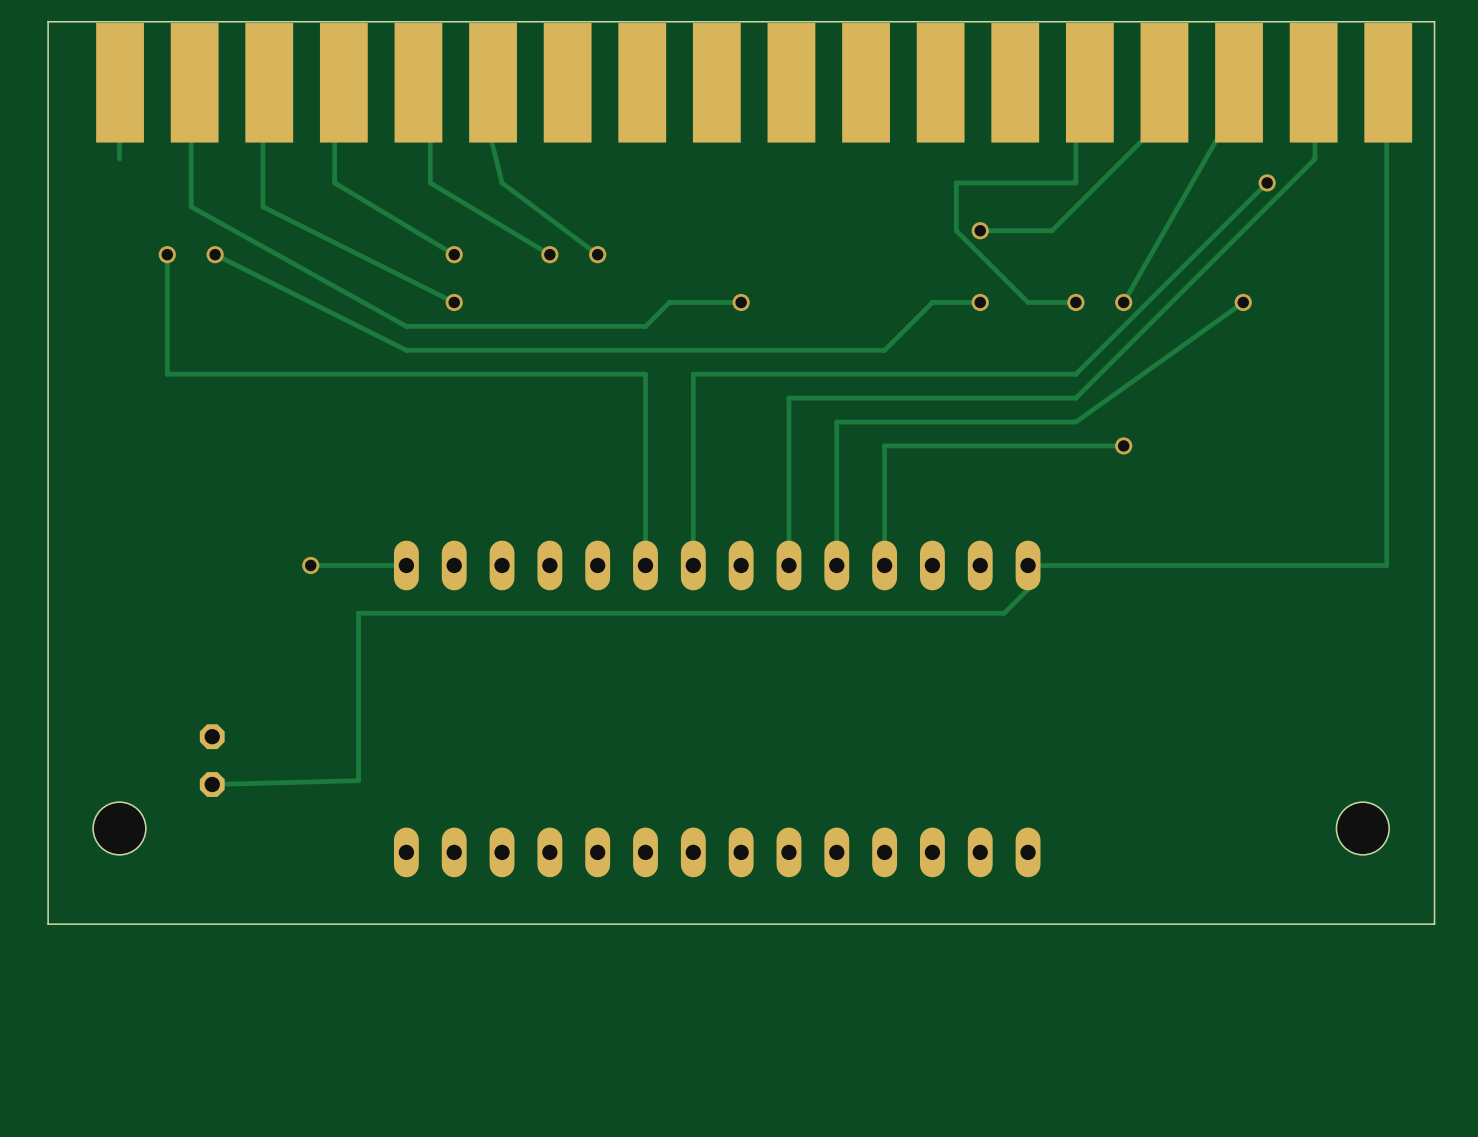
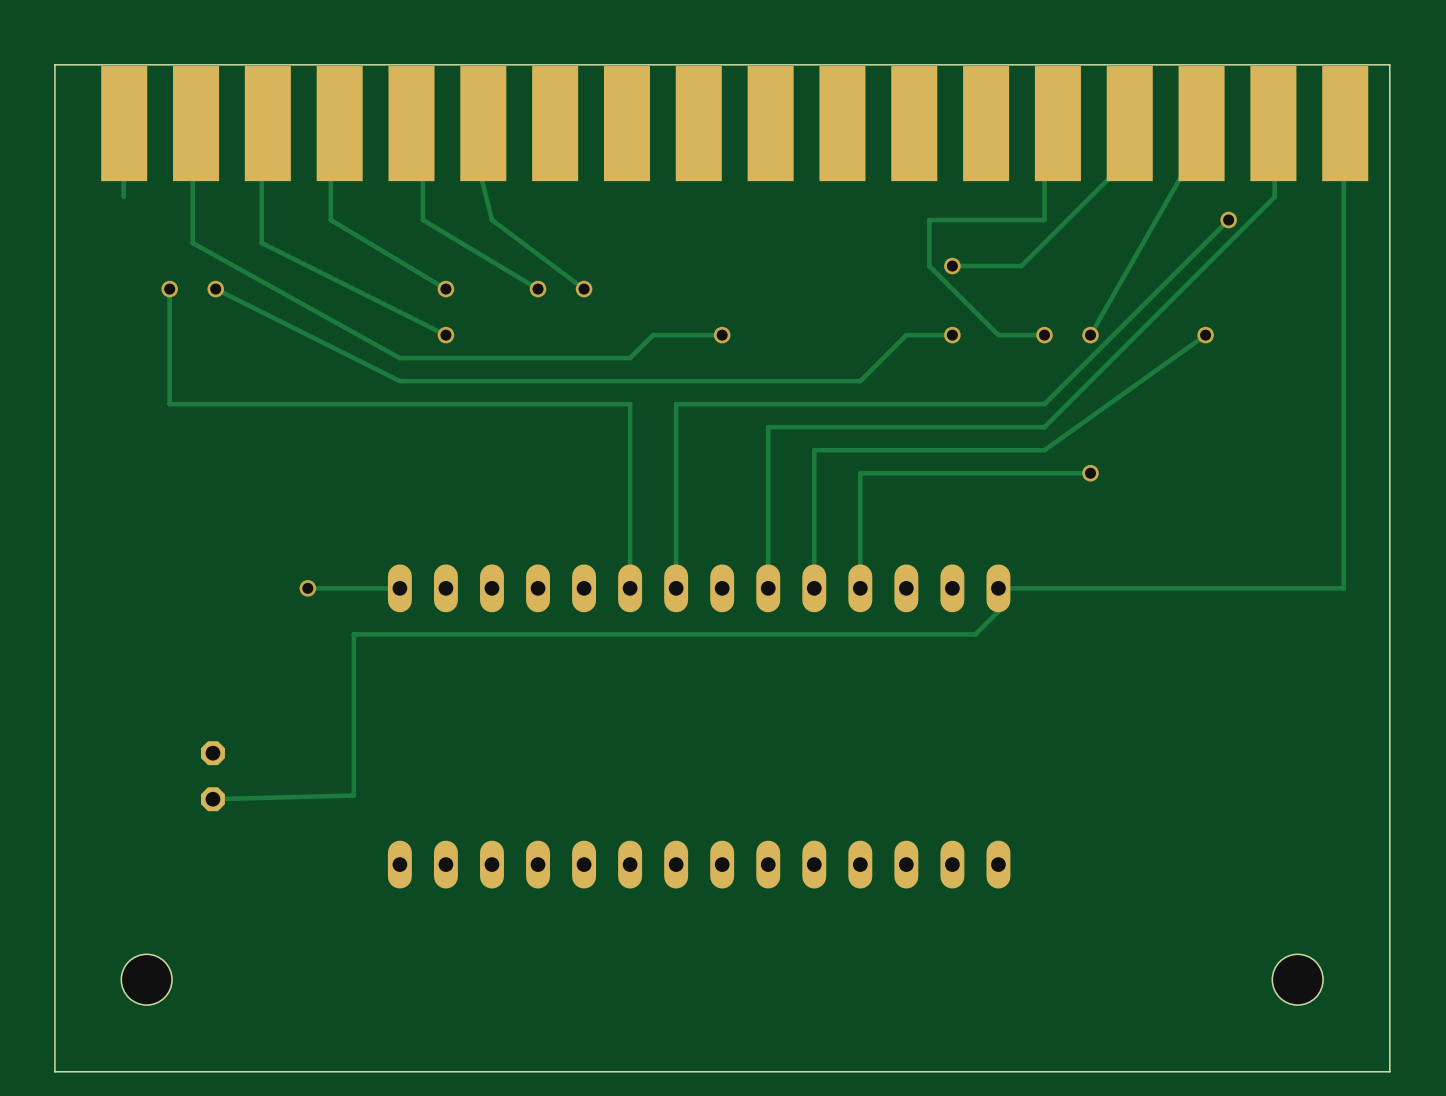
hole position: (119, 828) -> (146, 979)
hole position: (1362, 828) -> (1297, 979)
board edge: (1434, 924) (48, 924) -> (1389, 933) (1389, 1071) (54, 1071) (54, 933)

